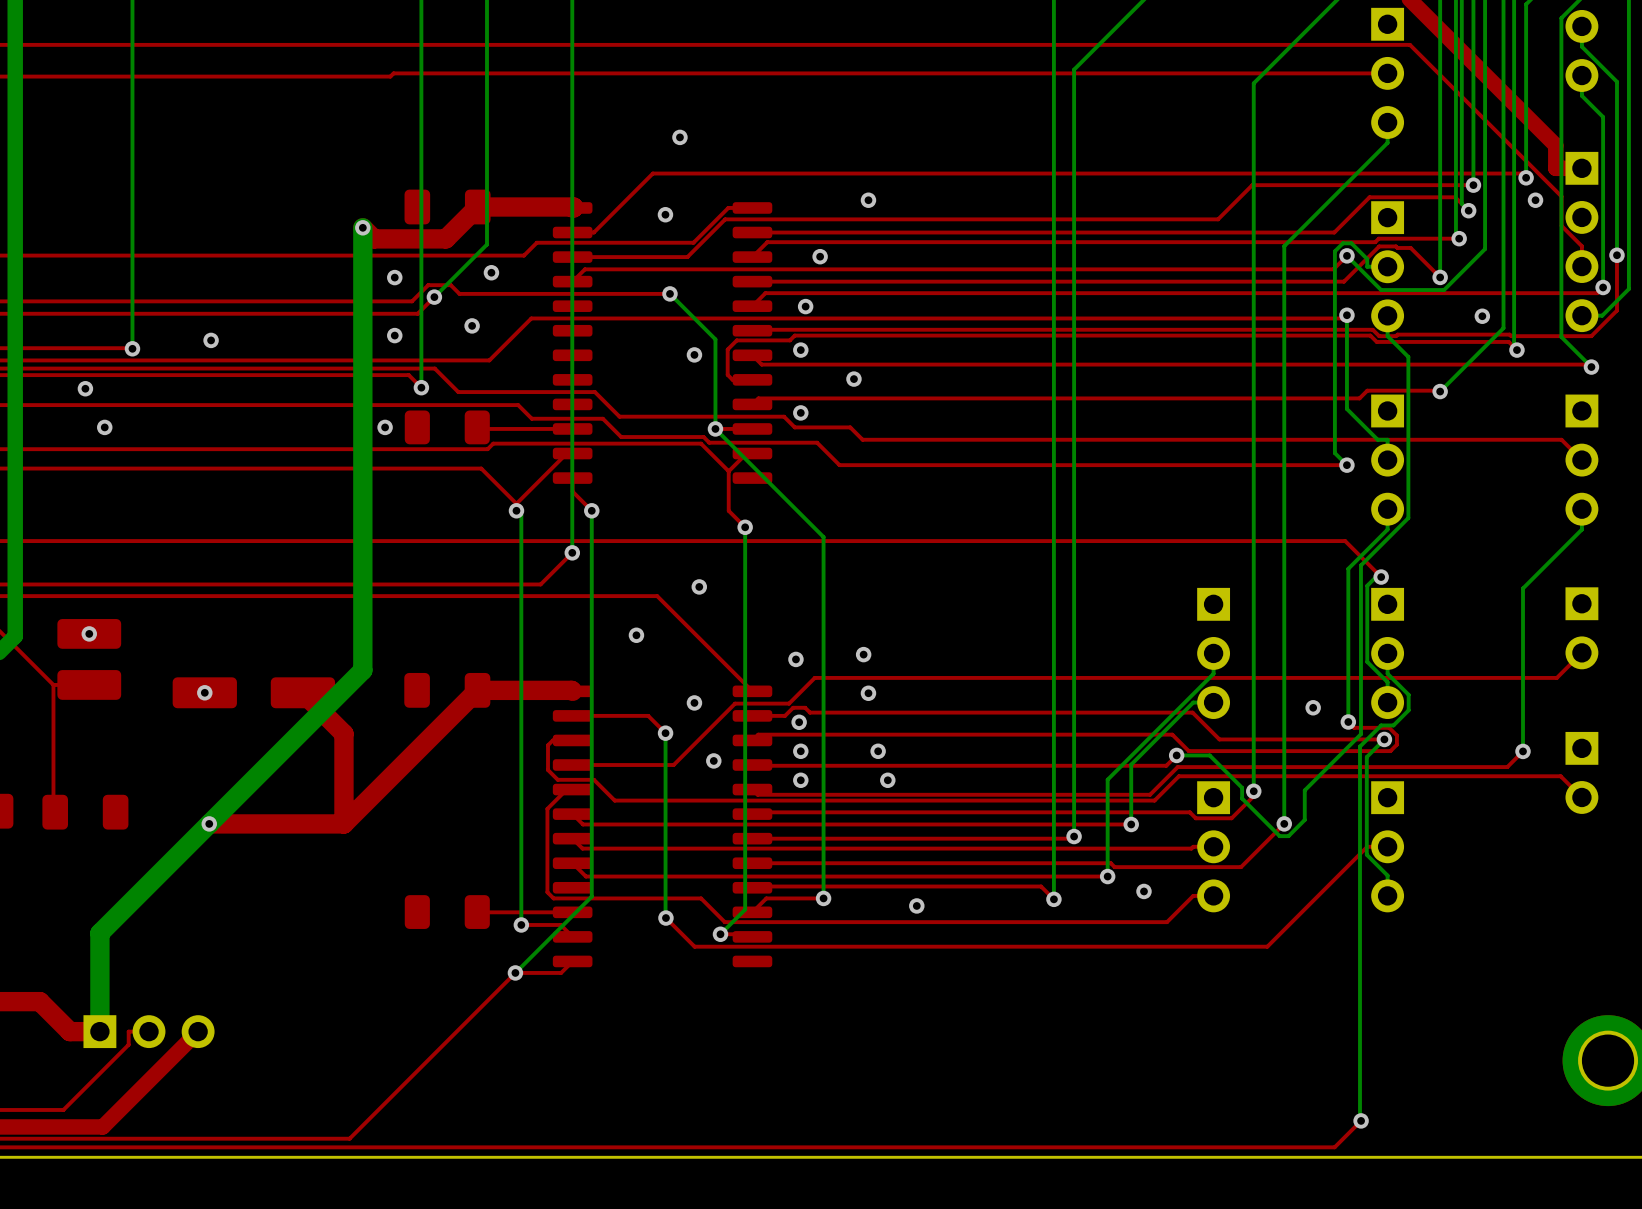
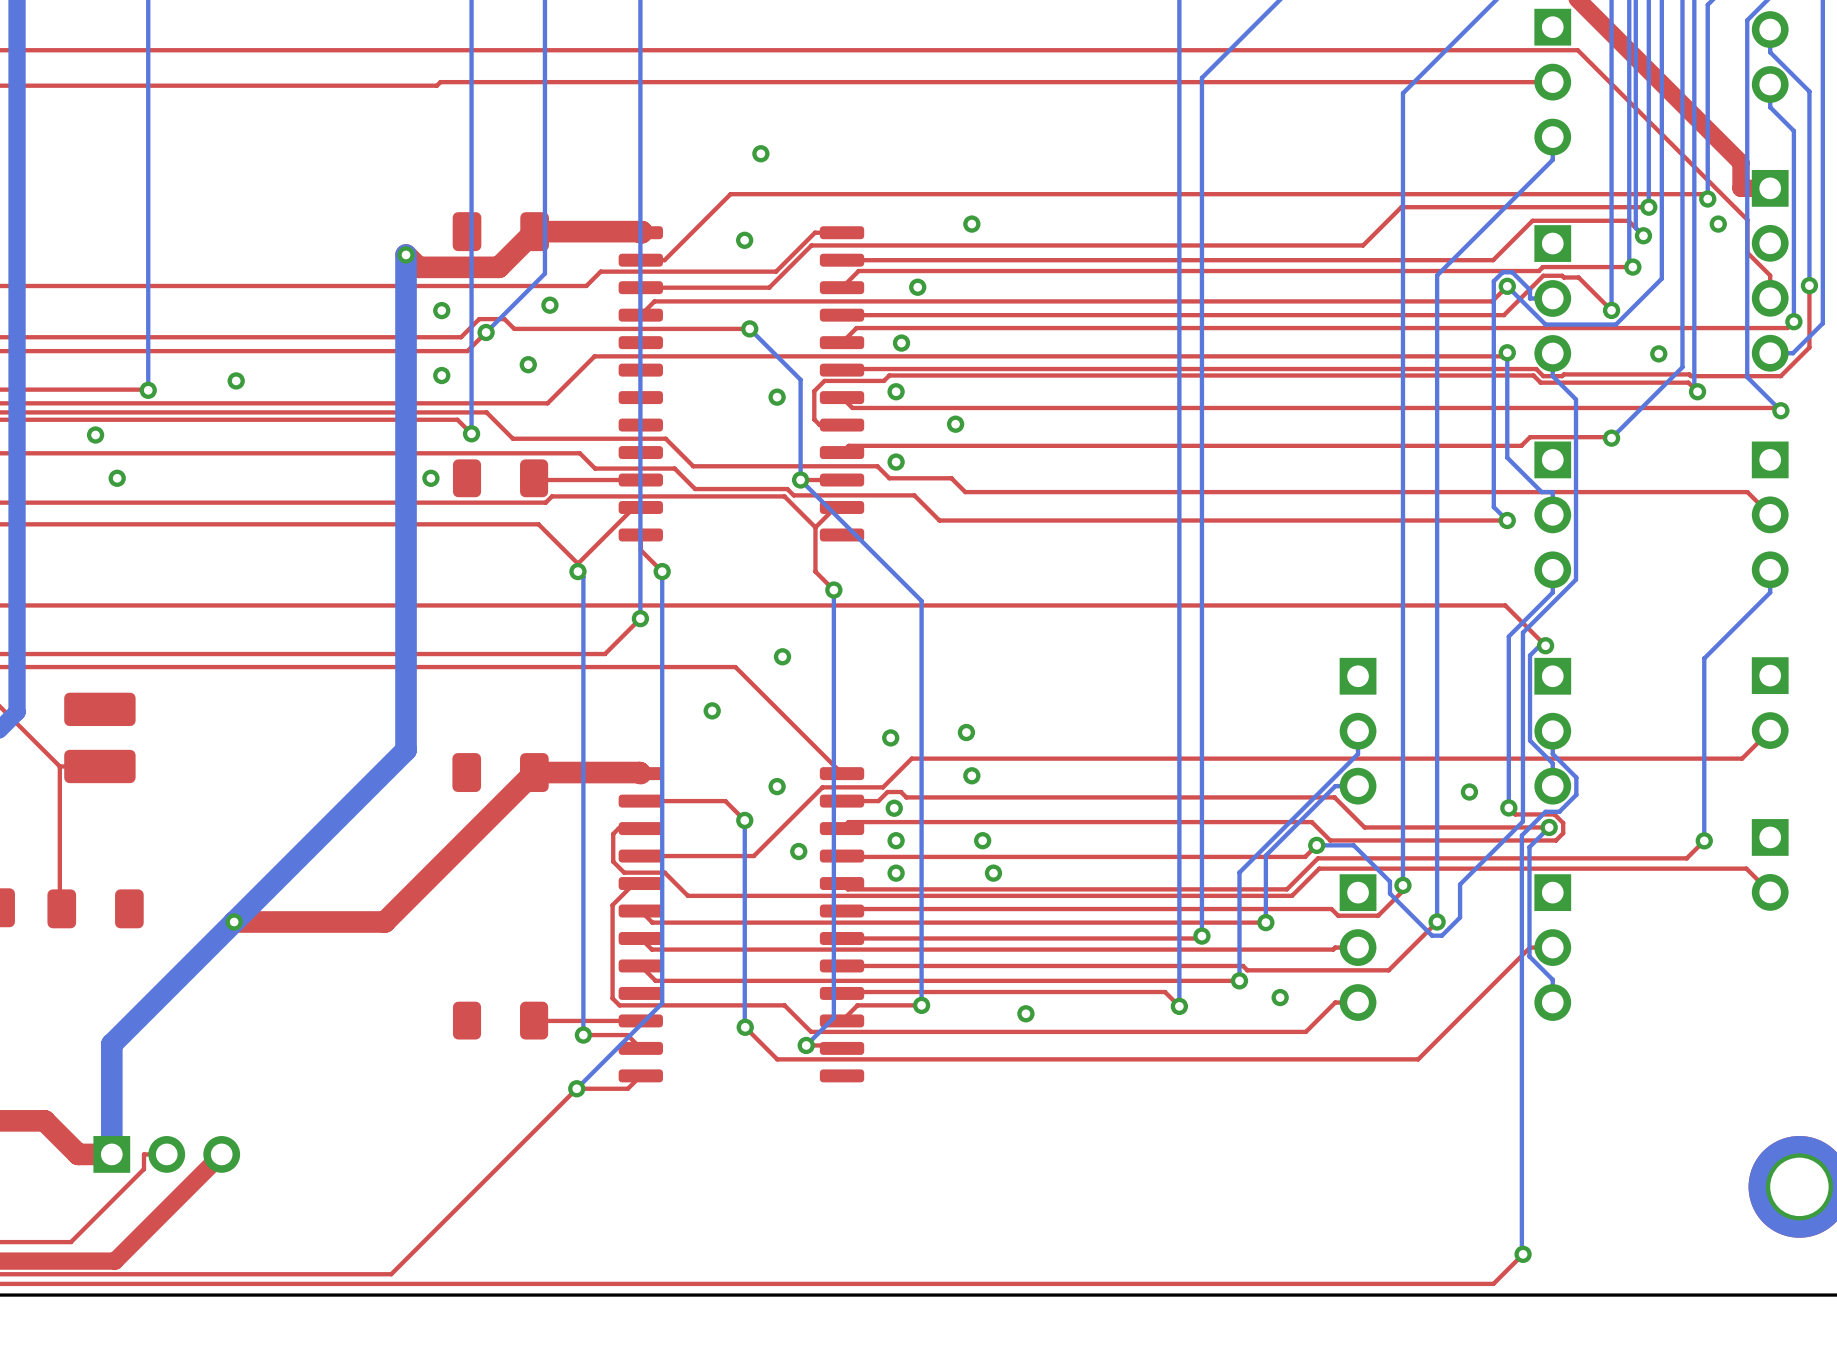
via: (89, 633) -> none
via: (204, 692) -> none
part: (253, 692) -> none
top track: (302, 692) (343, 733) (343, 823) -> none

